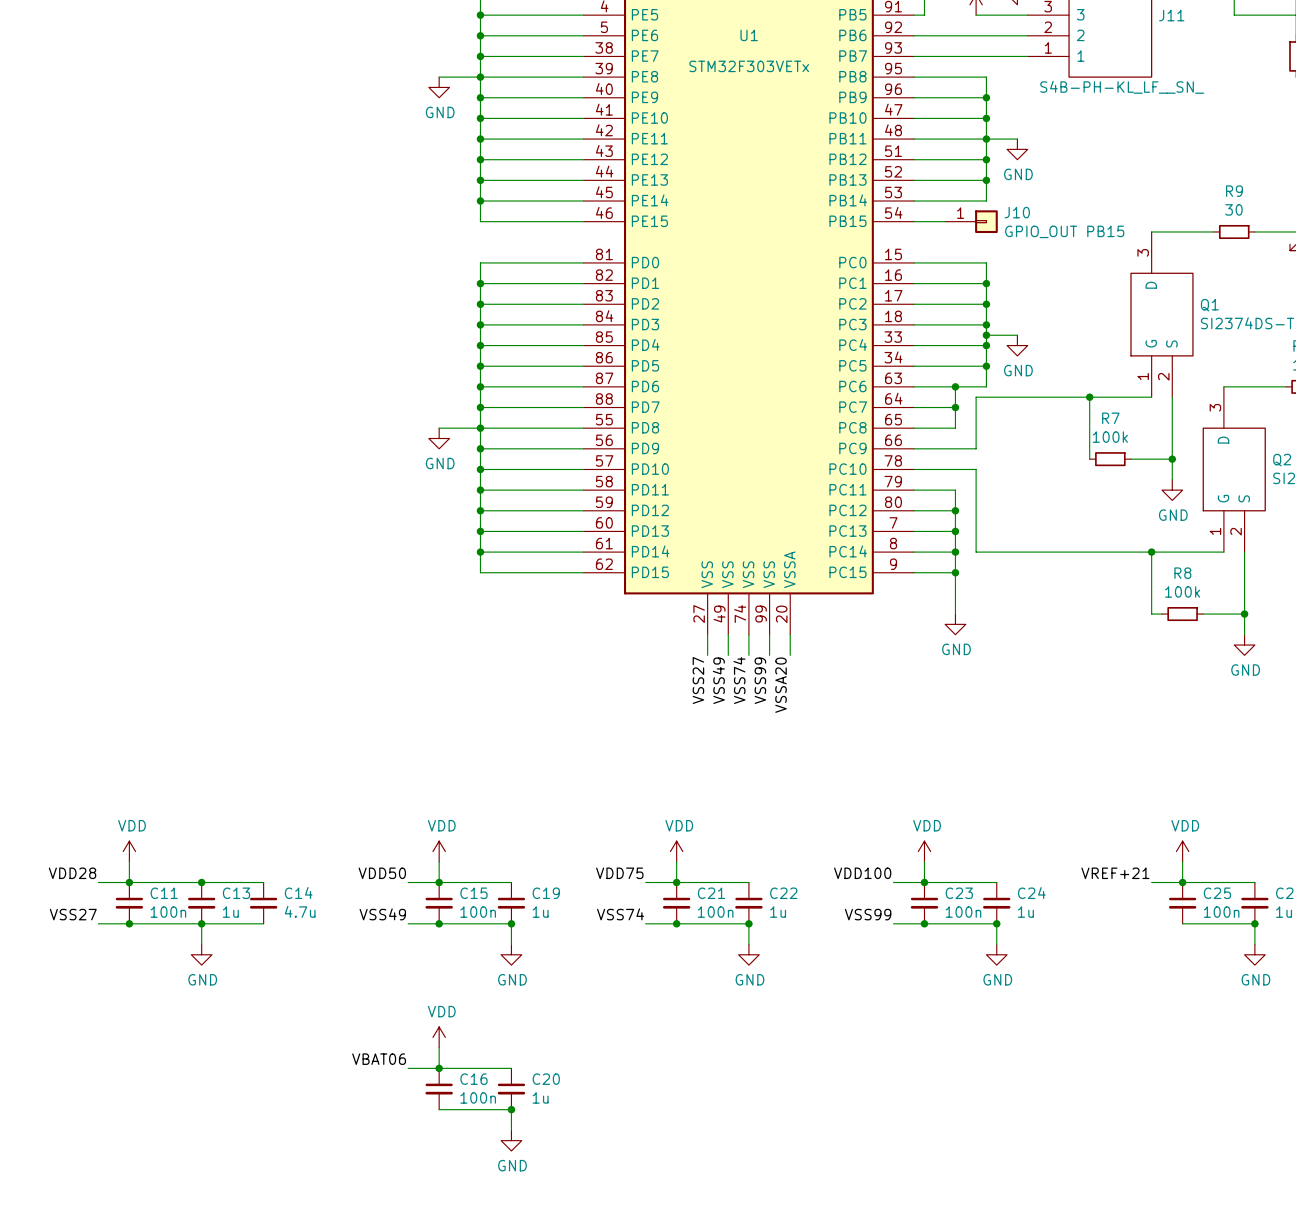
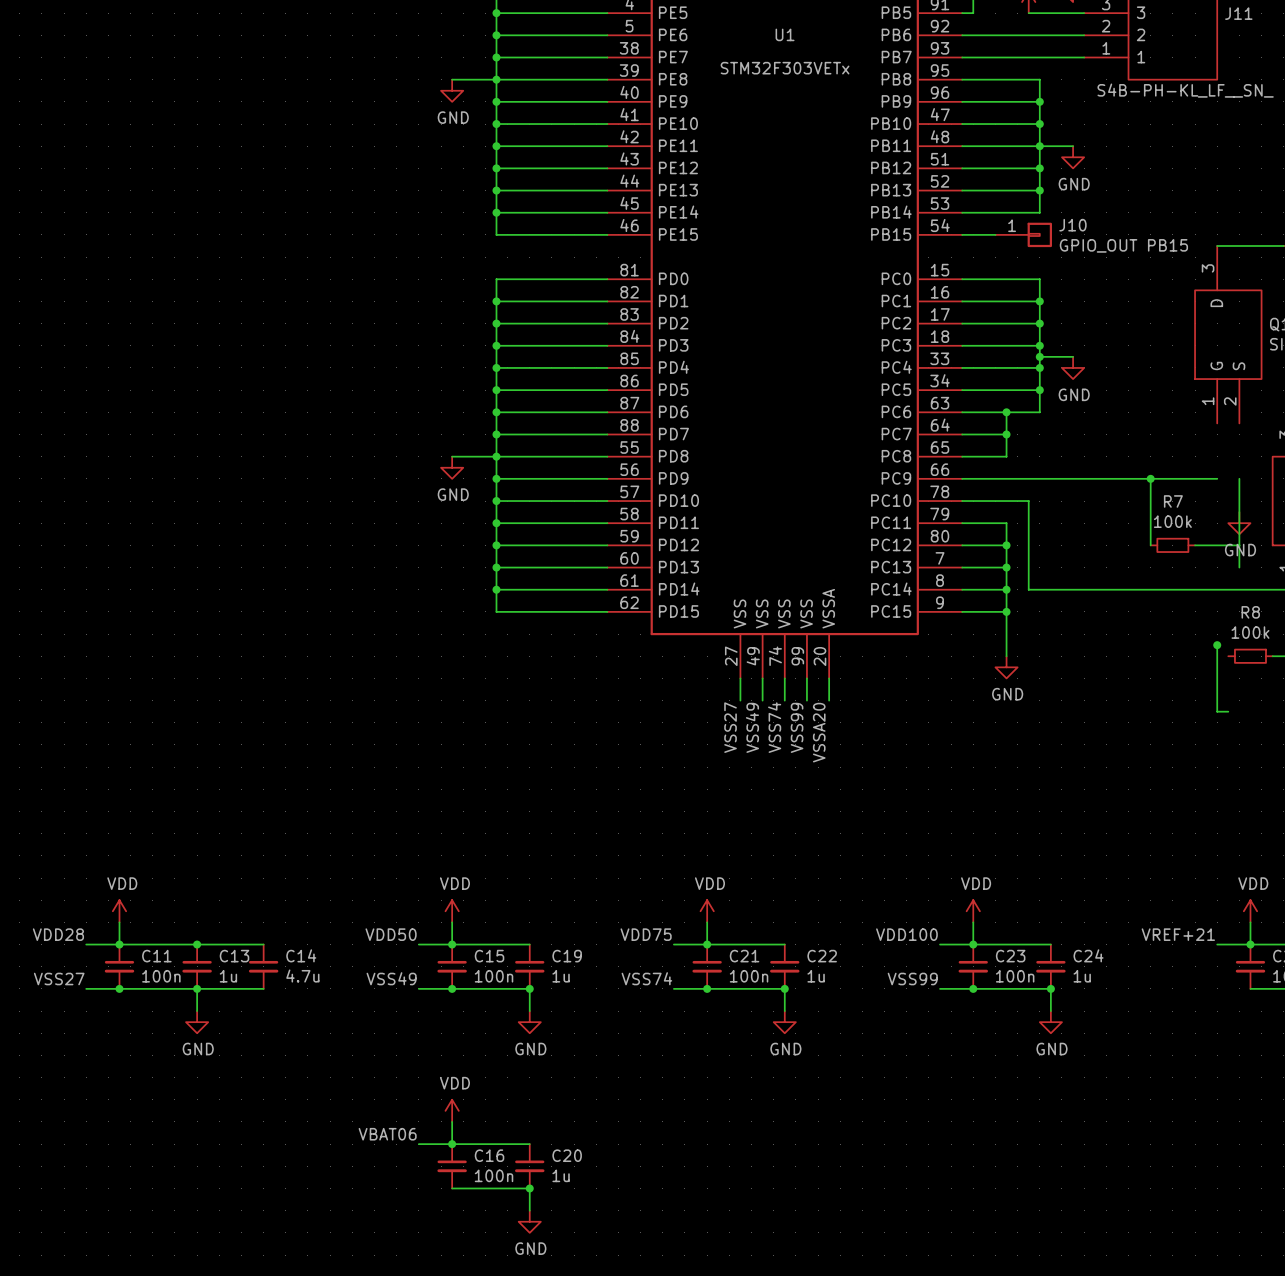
wire: (1089, 397) (1089, 448) -> (1150, 489) (1150, 545)
junction: (1089, 397) -> none
wire: (1151, 397) (976, 397) (976, 448) -> (1217, 478) (1028, 478)
wire: (1172, 397) (1172, 448) -> none
junction: none -> (1150, 478)
R7 position: (1110, 459) -> (1172, 545)
wire: (1130, 459) (1172, 459) -> (1195, 545) (1239, 545)
junction: (1172, 459) -> none
wire: (1151, 552) (1151, 603) -> (1239, 512) (1239, 567)
junction: (1151, 552) -> none
junction: none -> (1217, 645)
wire: (1151, 614) (1161, 614) -> (1217, 656) (1217, 711) (1228, 711)

